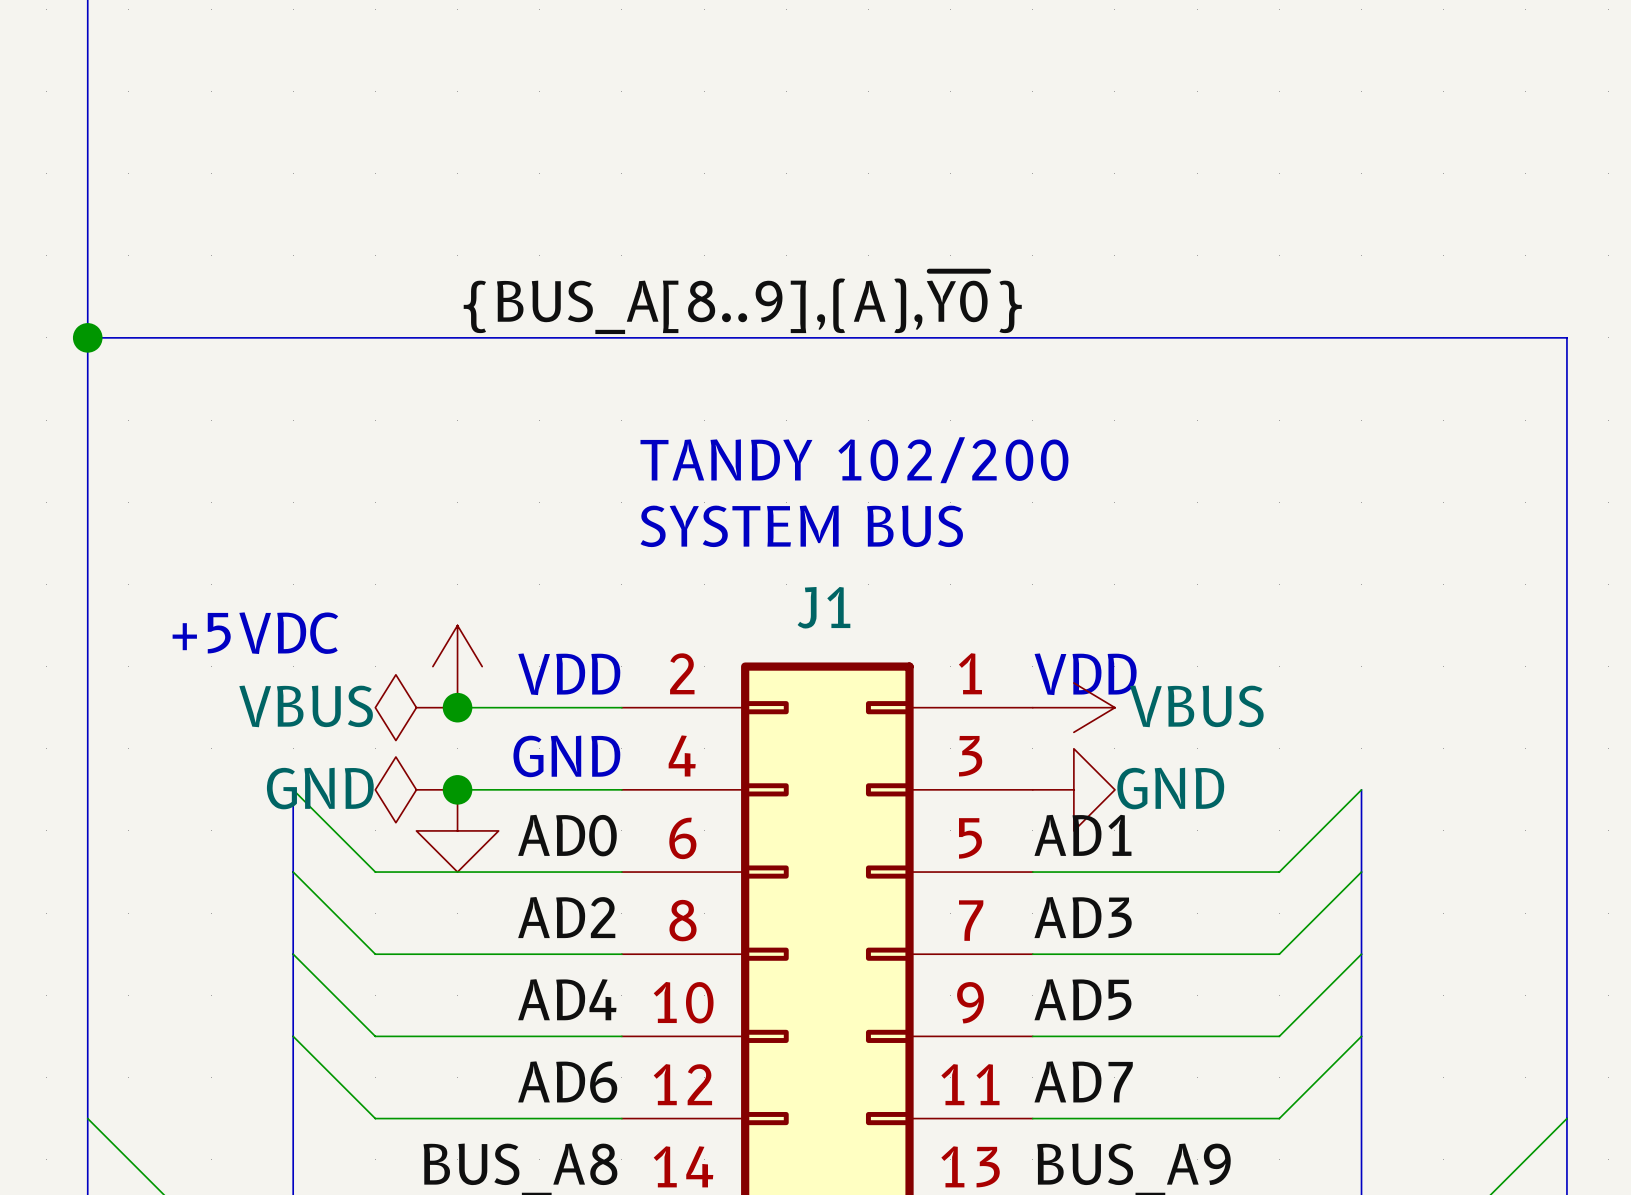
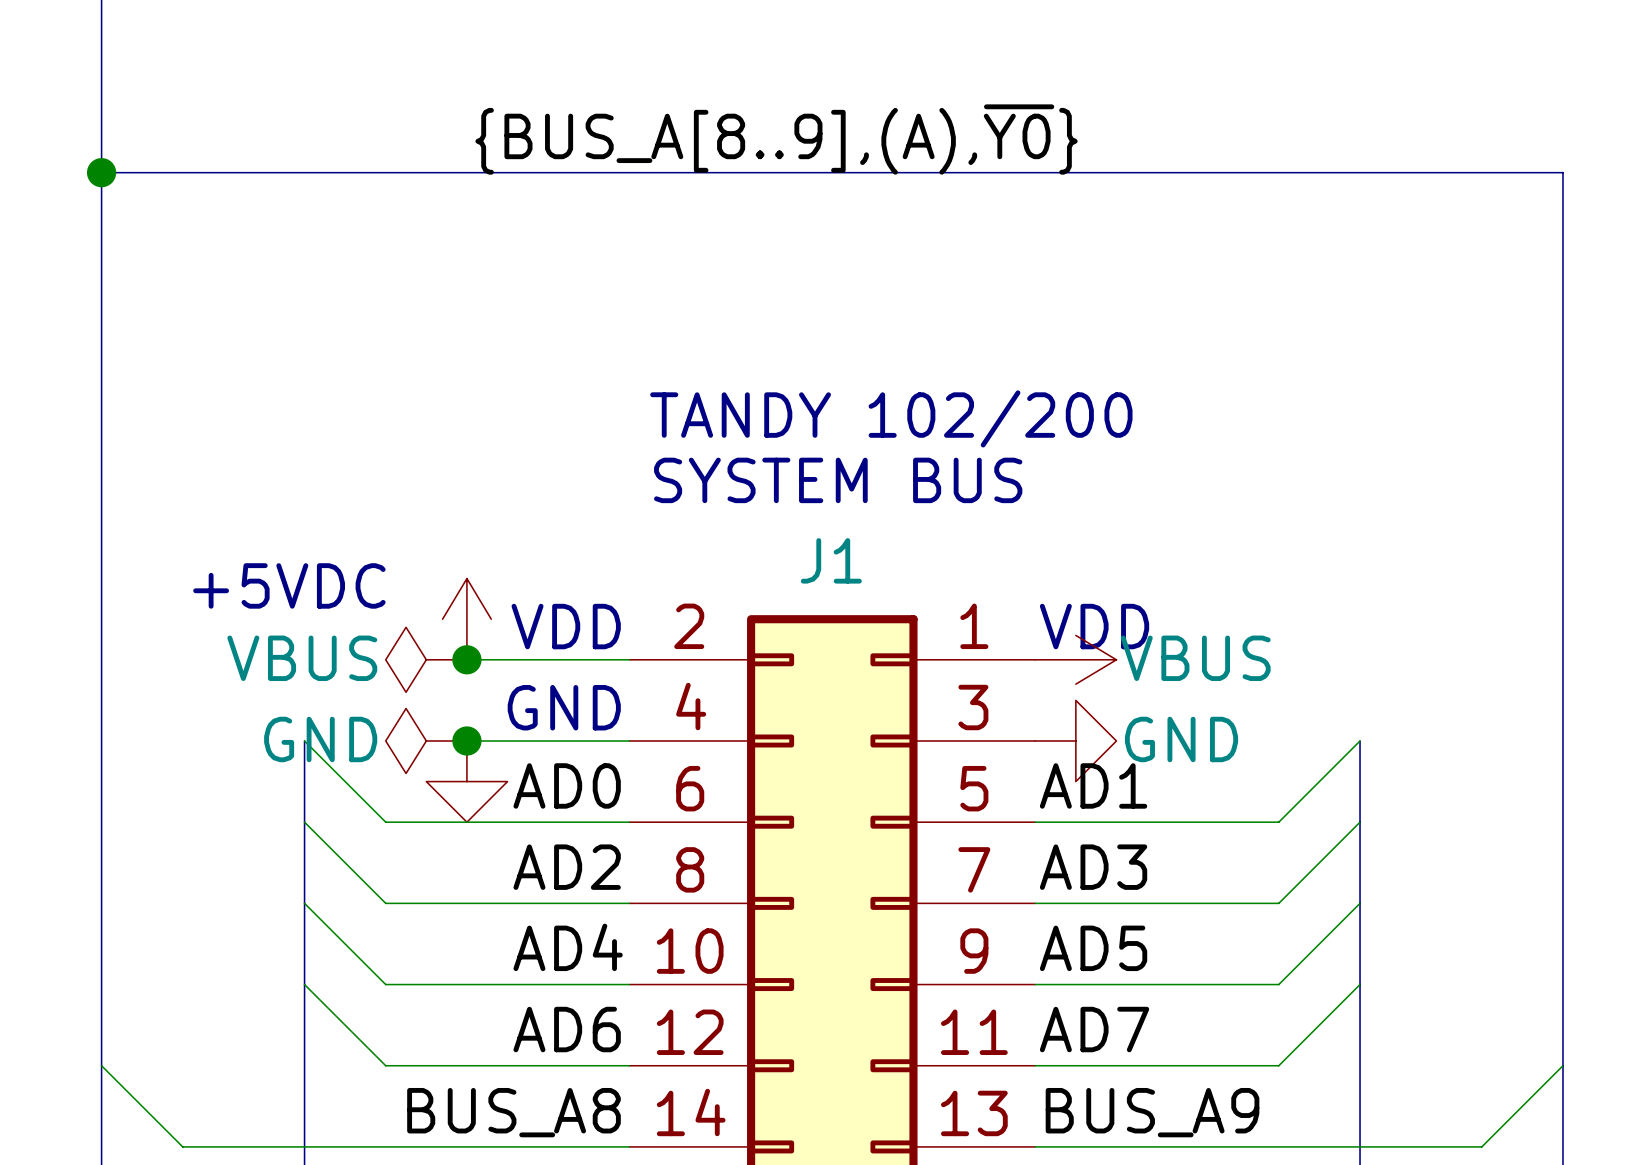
label position: {BUS_A[8..9],(A),~{Y0}} (742, 302) -> {BUS_A[8..9],(A),~{Y0}} (776, 139)
bus: (87, 337) (1566, 337) -> (101, 172) (1562, 172) (1562, 294)
junction position: (87, 337) -> (101, 172)

